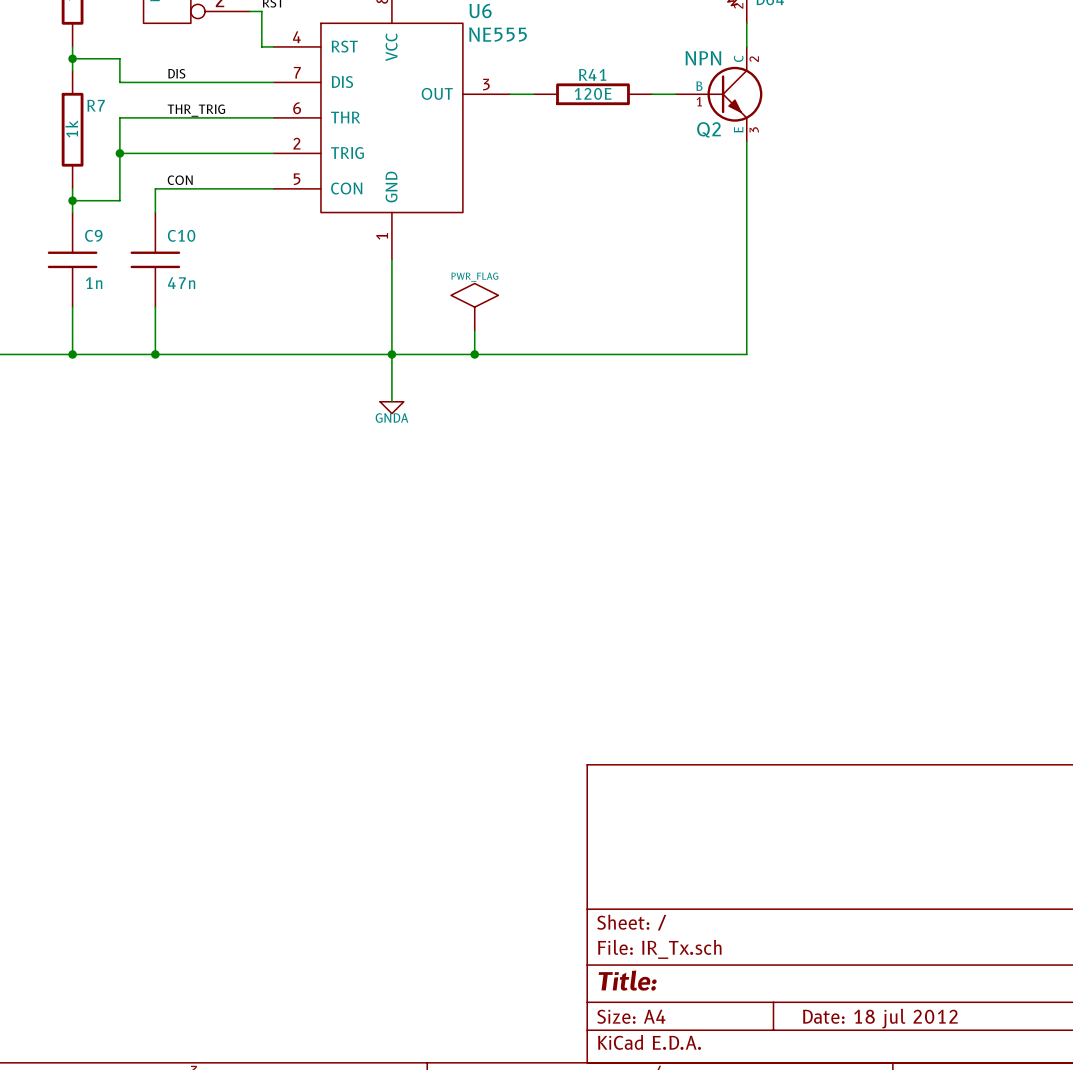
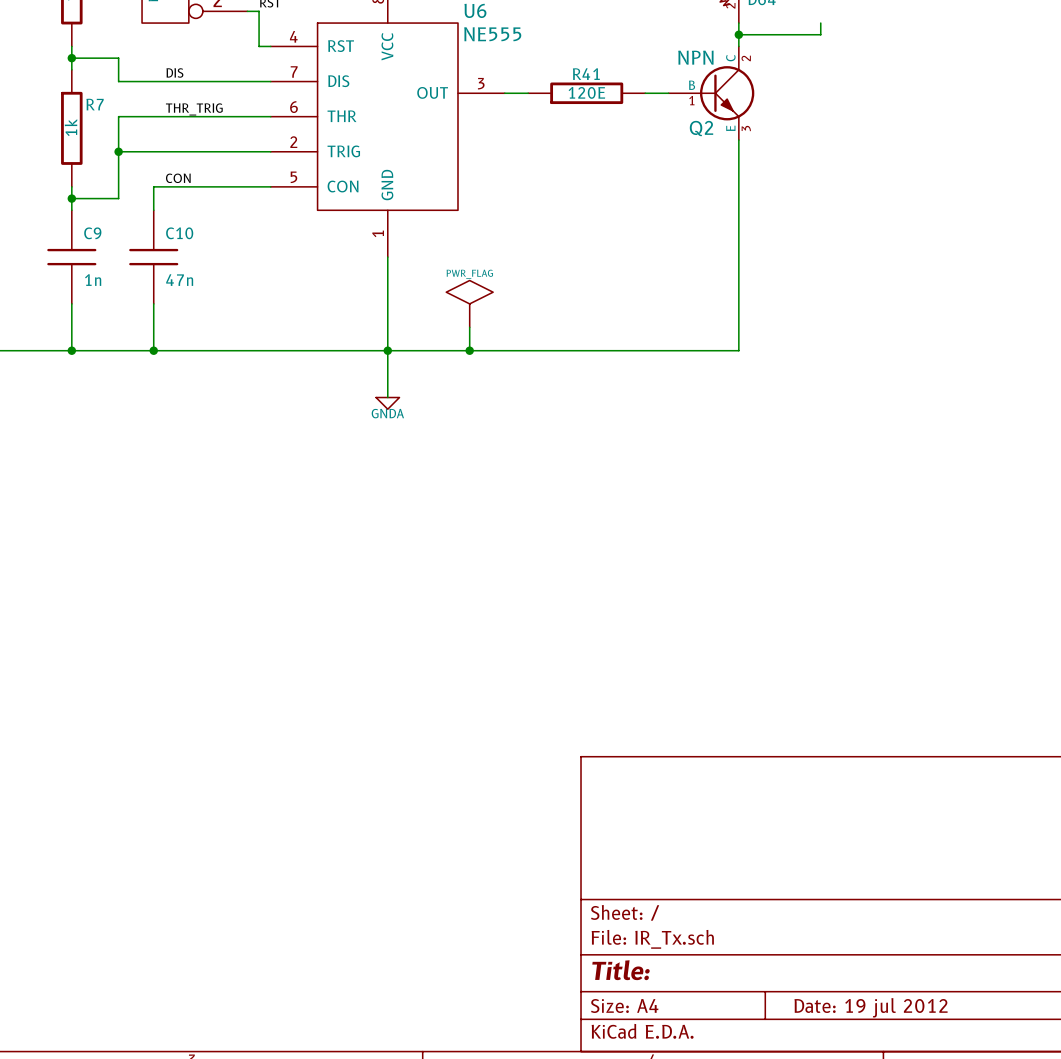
wire: none -> (820, 23) (820, 34) (738, 34)
junction: none -> (738, 34)
title block: Date: 18 jul 2012 (880, 1018) -> Date: 19 jul 2012 (871, 1007)

